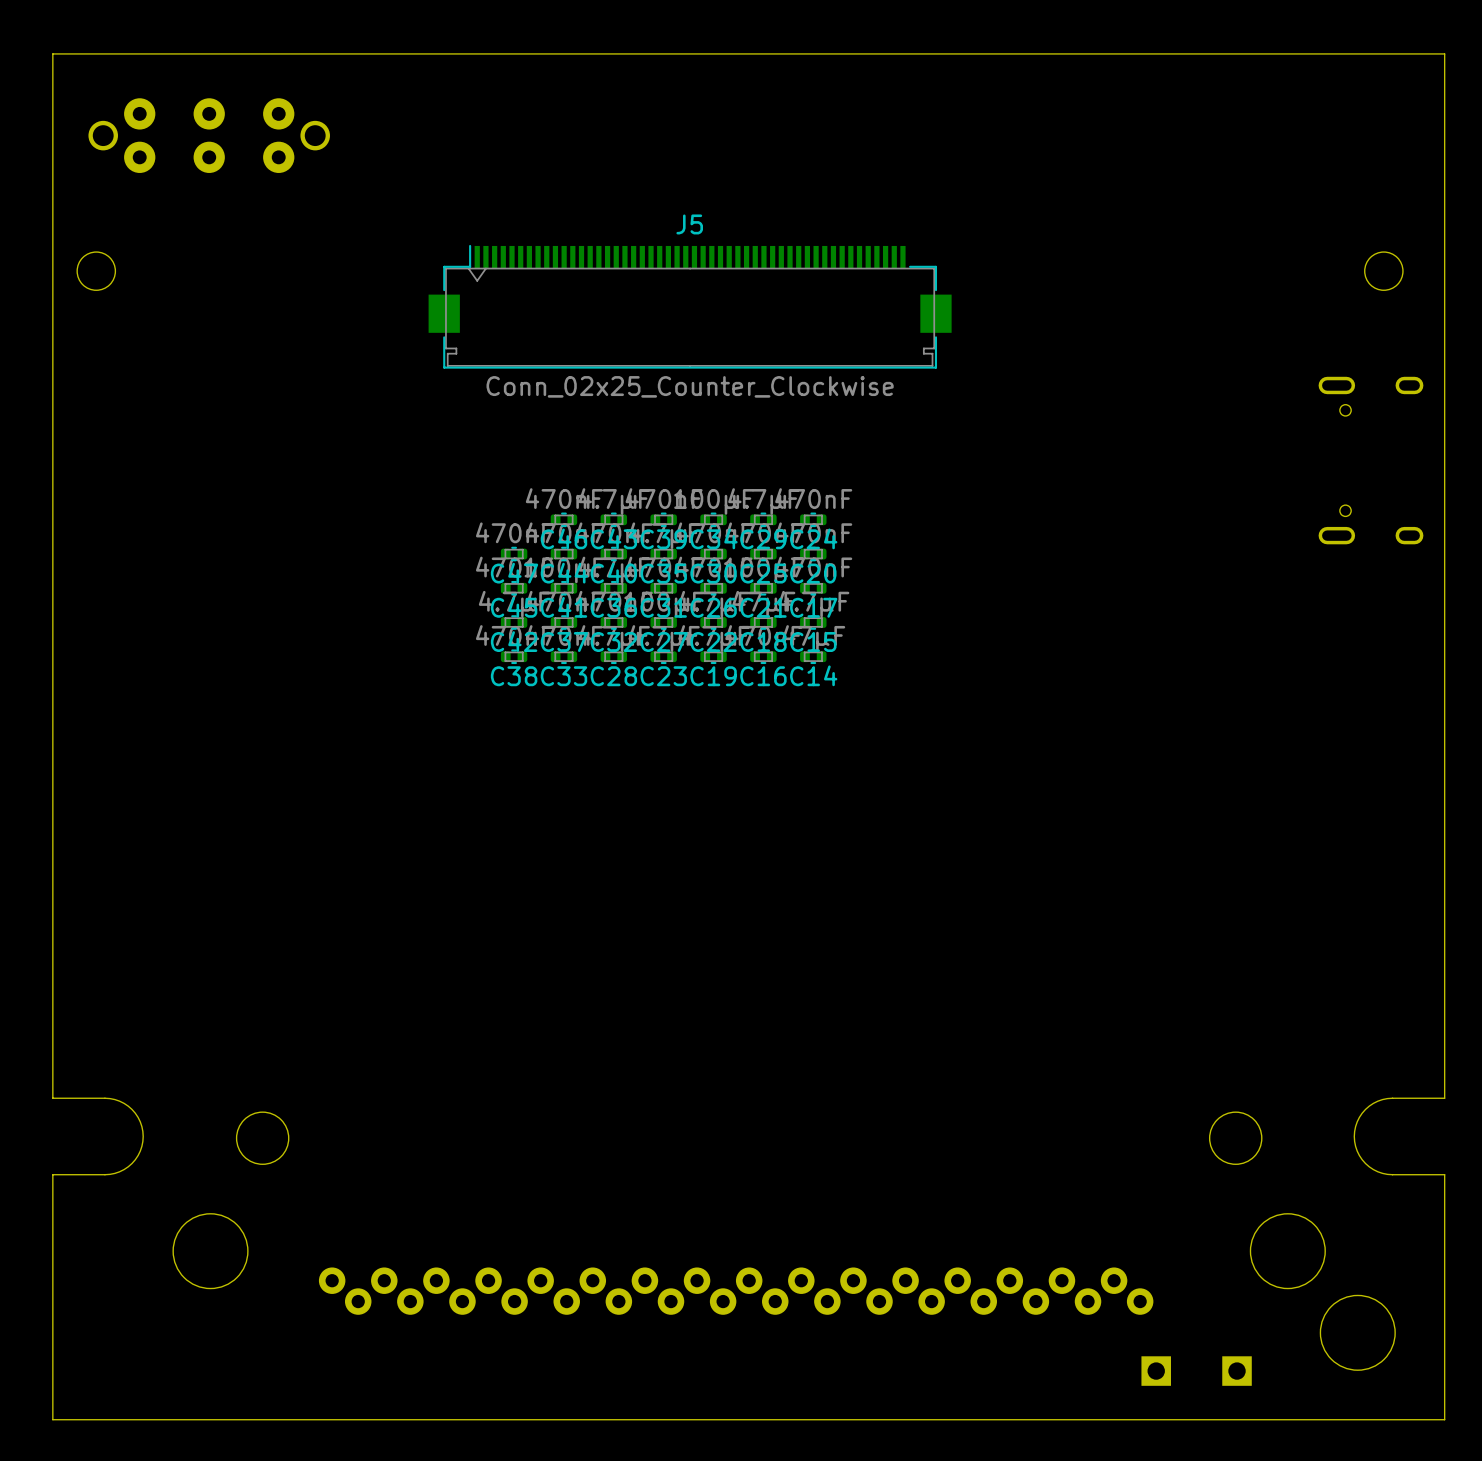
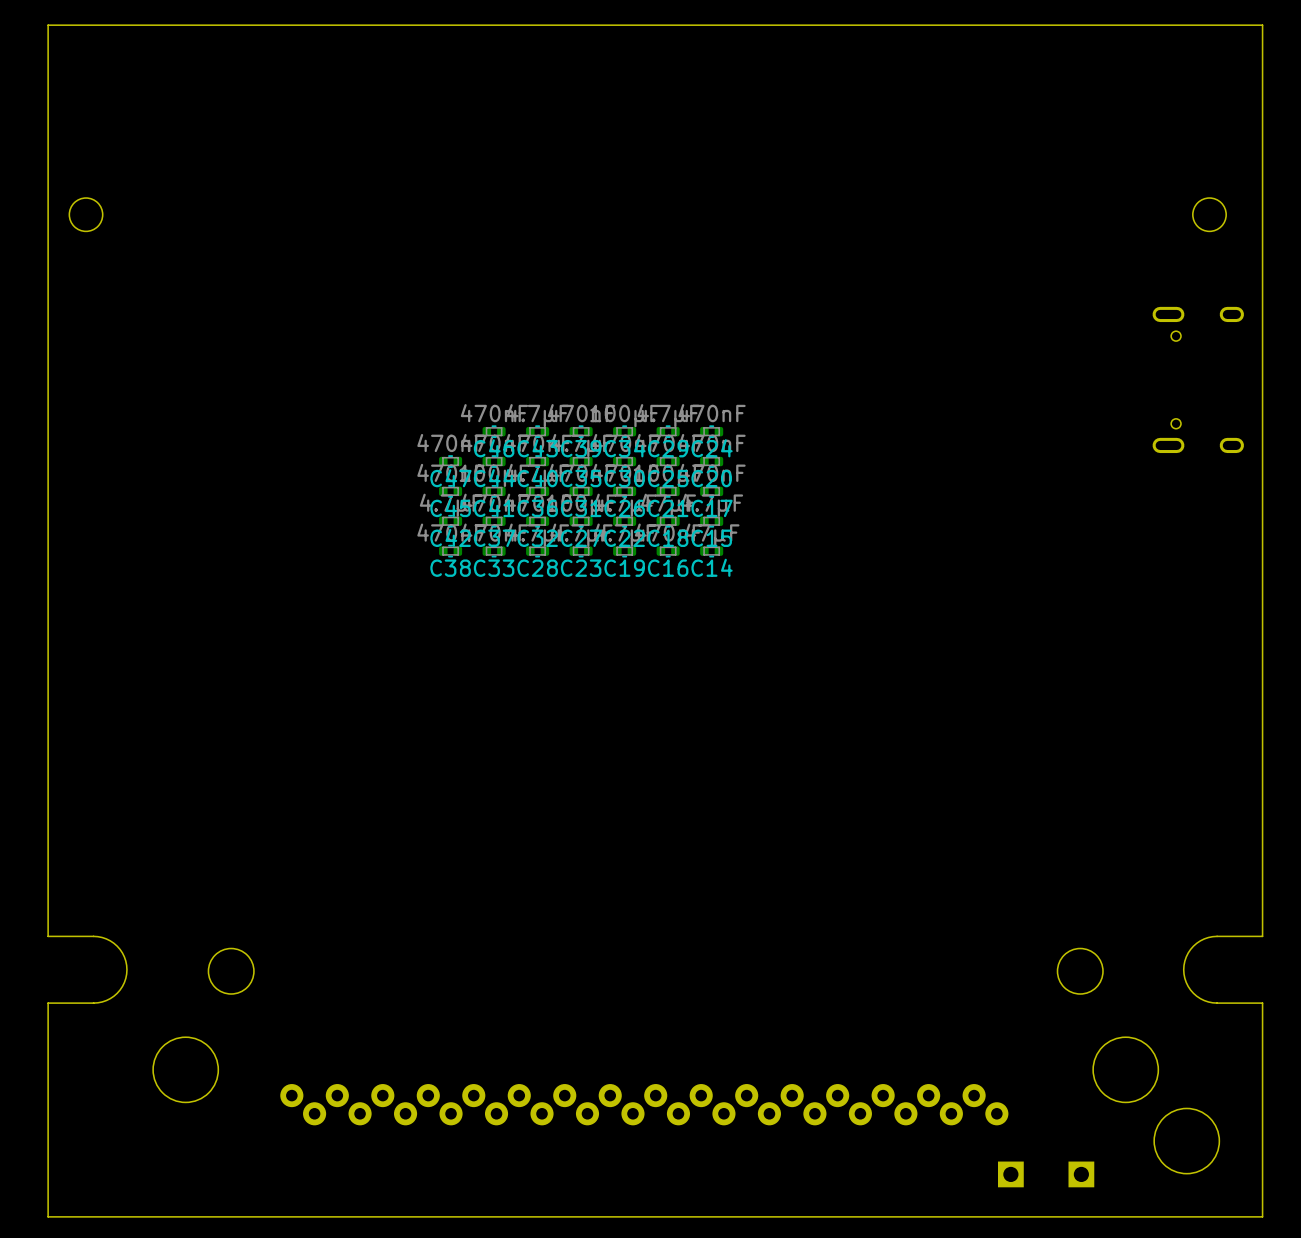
part: (209, 135) -> none
J5: Conn_02x25_Counter_Clockwise (690, 306) -> none

